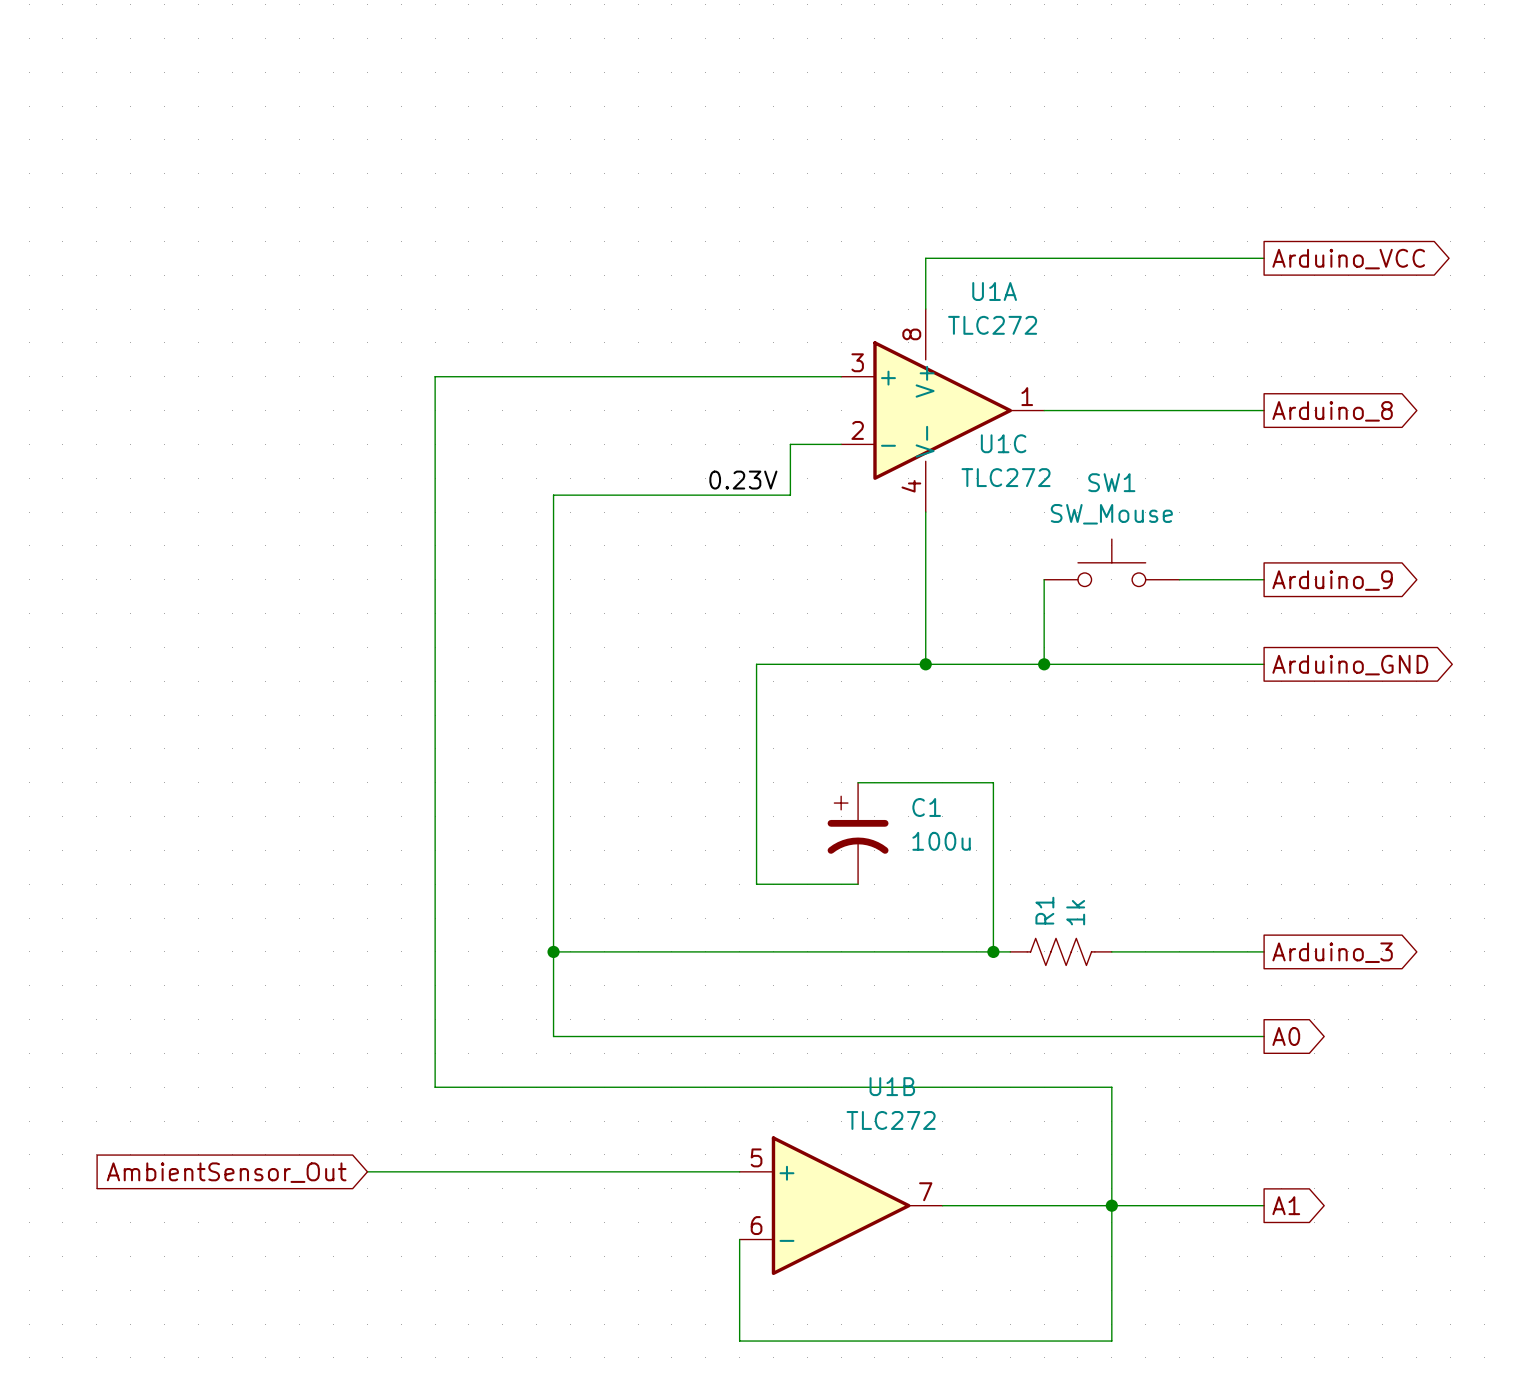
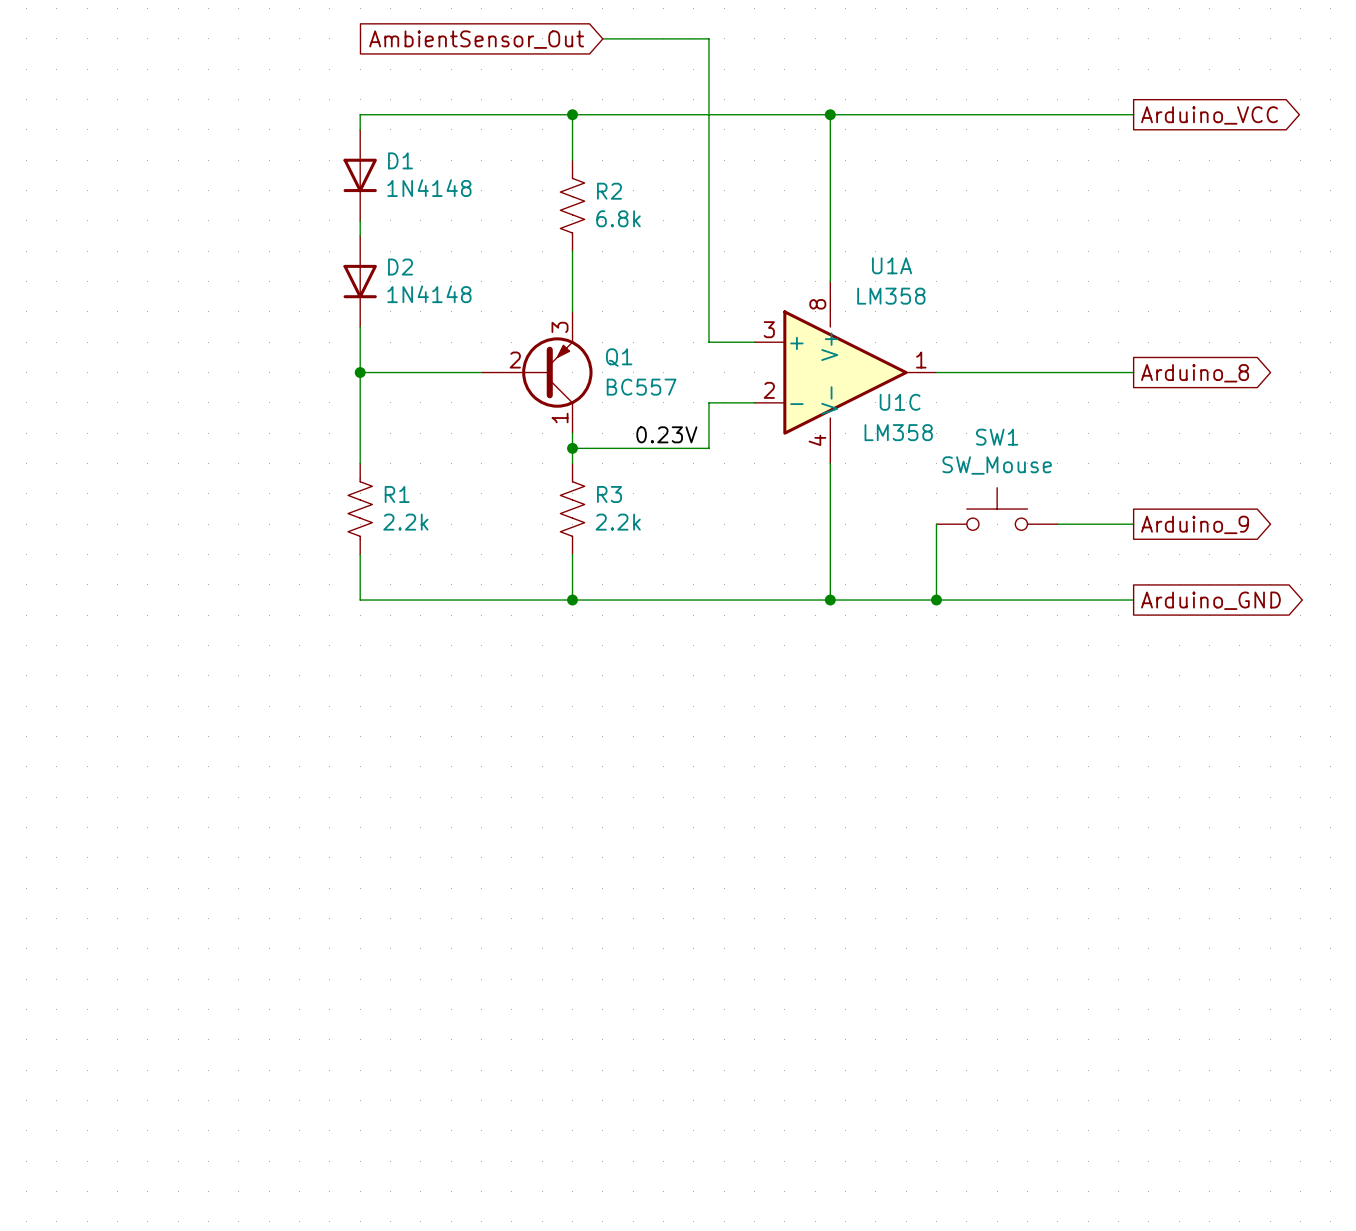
global label: none -> AmbientSensor_Out (476, 39)
wire: none -> (572, 114) (572, 160)
junction: none -> (572, 114)
junction: none -> (830, 114)
wire: none -> (1133, 114) (360, 114) (360, 129)
D1: none -> 1N4148 (360, 175)
R2: none -> 6.8k (572, 205)
wire: none -> (360, 220) (360, 236)
wire: (925, 258) (1264, 258) -> (830, 236) (830, 114)
global label position: Arduino_VCC (1348, 259) -> Arduino_VCC (1209, 115)
wire: none -> (572, 251) (572, 311)
D2: none -> 1N4148 (360, 281)
U1A value: TLC272 (992, 325) -> LM358 (891, 296)
wire: none -> (360, 327) (360, 463)
wire: (790, 376) (435, 376) (435, 1087) (1111, 1087) (1111, 1341) (739, 1341) (739, 1239) -> (709, 342) (709, 38) (602, 38)
wire: none -> (360, 372) (481, 372)
junction: none -> (360, 372)
Q1: none -> BC557 (537, 372)
U1C value: TLC272 (1006, 477) -> LM358 (898, 432)
wire: none -> (572, 433) (572, 463)
wire: (638, 495) (553, 495) (553, 1036) (1264, 1036) -> none
junction: none -> (572, 448)
R3: none -> 2.2k (572, 509)
wire: none -> (572, 554) (572, 600)
junction: none -> (572, 600)
wire: (756, 664) (756, 884) (858, 884) -> (678, 600) (360, 600) (360, 554)
wire: (858, 782) (993, 782) (993, 951) -> none
C1: 100u (858, 833) -> none
R1 value: 1k (1075, 912) -> 2.2k (405, 522)
wire: (553, 951) (1010, 951) -> none
junction: (553, 951) -> none
junction: (993, 951) -> none
R1 rotation: 0° (1061, 951) -> 90° clockwise (360, 509)
R1 position: (1061, 951) -> (360, 509)
wire: (1111, 951) (1264, 951) -> none
global label: Arduino_3 (1332, 952) -> none
global label: A0 (1286, 1036) -> none
wire: (367, 1171) (739, 1171) -> none
global label: AmbientSensor_Out (226, 1172) -> none
U1B: TLC272 (841, 1205) -> none
wire: (942, 1205) (1264, 1205) -> none
junction: (1111, 1205) -> none
global label: A1 (1286, 1205) -> none

